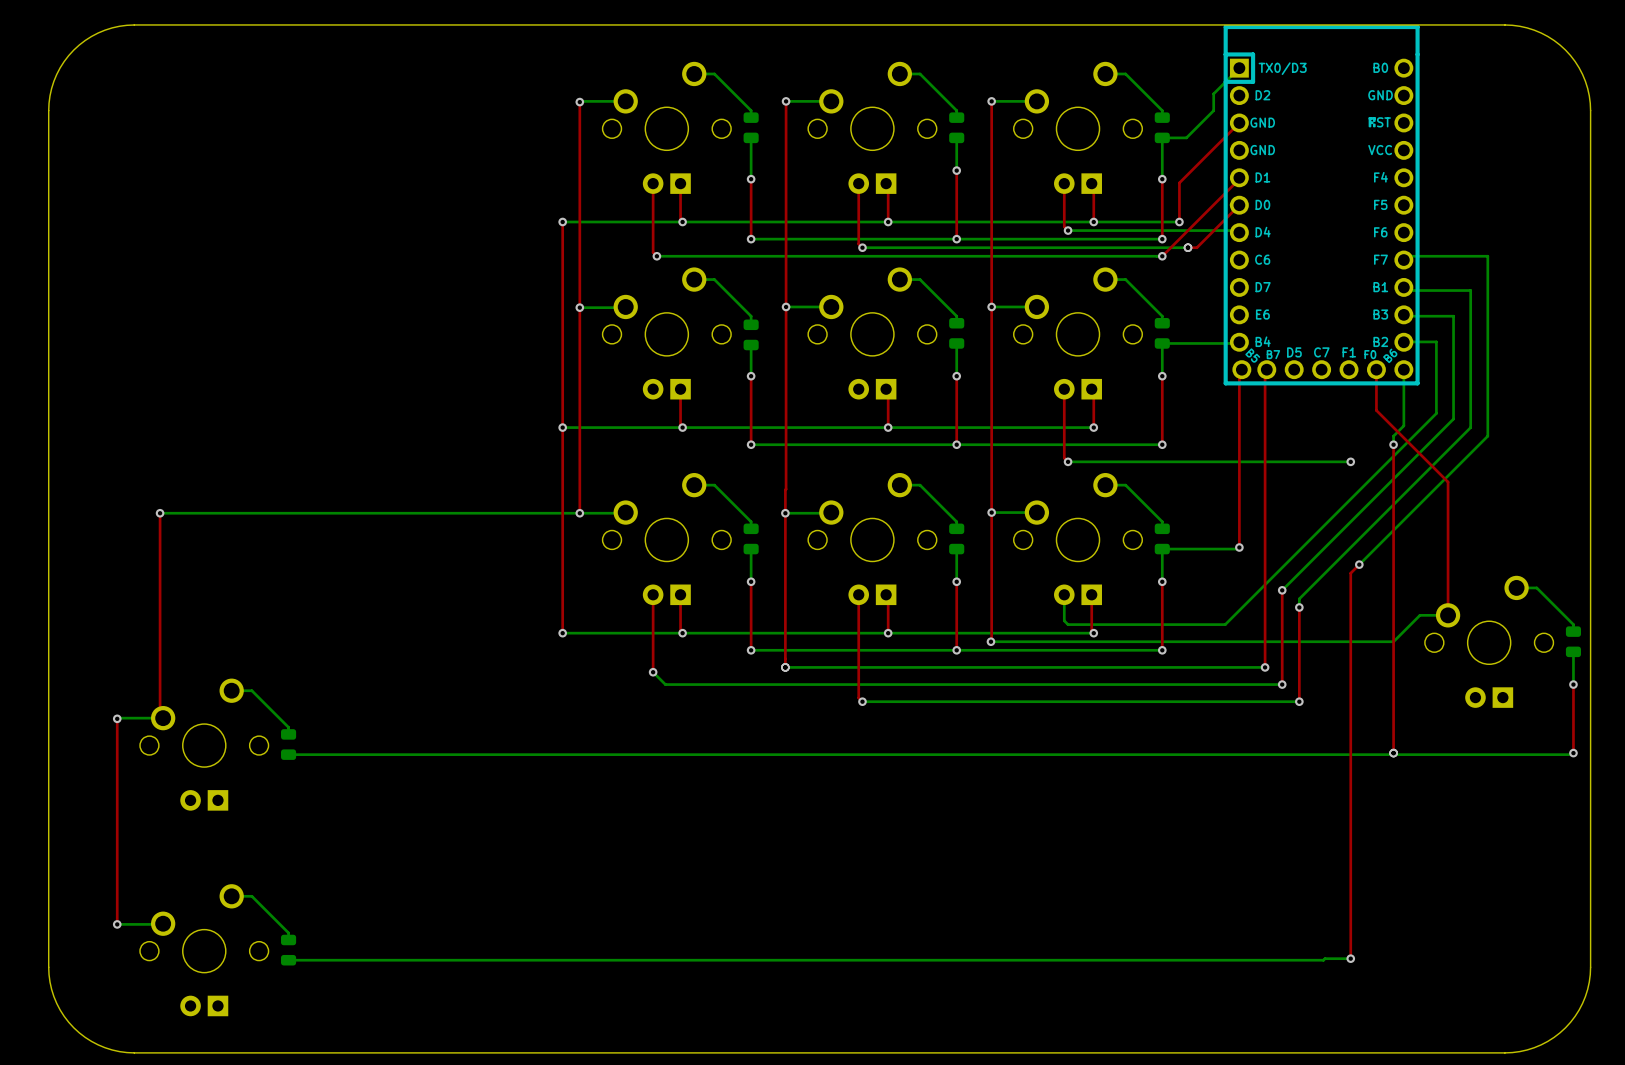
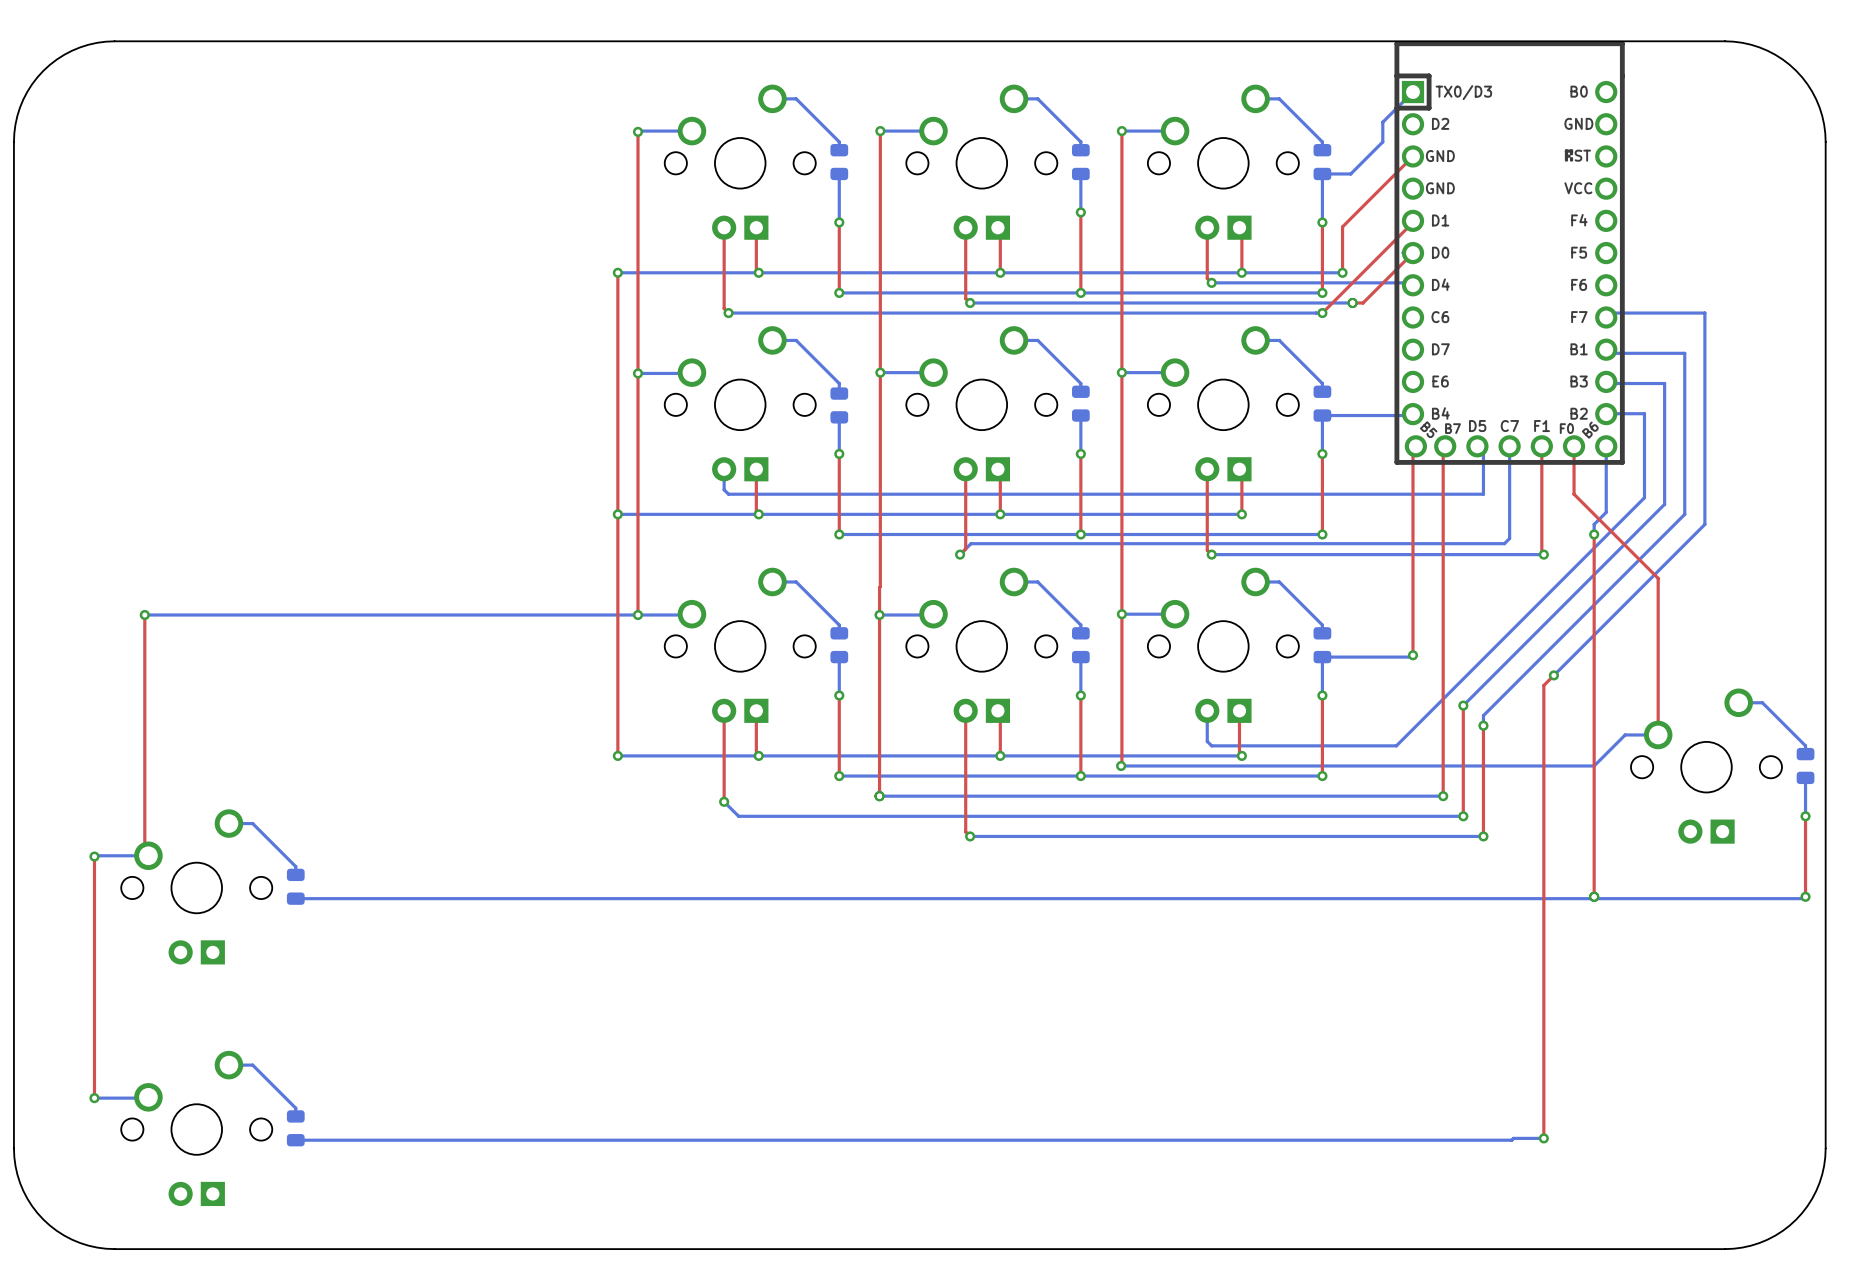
bottom track: none -> (1477, 446) (1483, 452) (1483, 494) (728, 494) (724, 489) (724, 469)
bottom track: none -> (1509, 446) (1509, 538) (1504, 543) (971, 543) (960, 554)
top track: none -> (1541, 446) (1541, 552) (1543, 554)
top track: none -> (965, 469) (965, 548) (960, 554)
via: none -> (960, 554)

